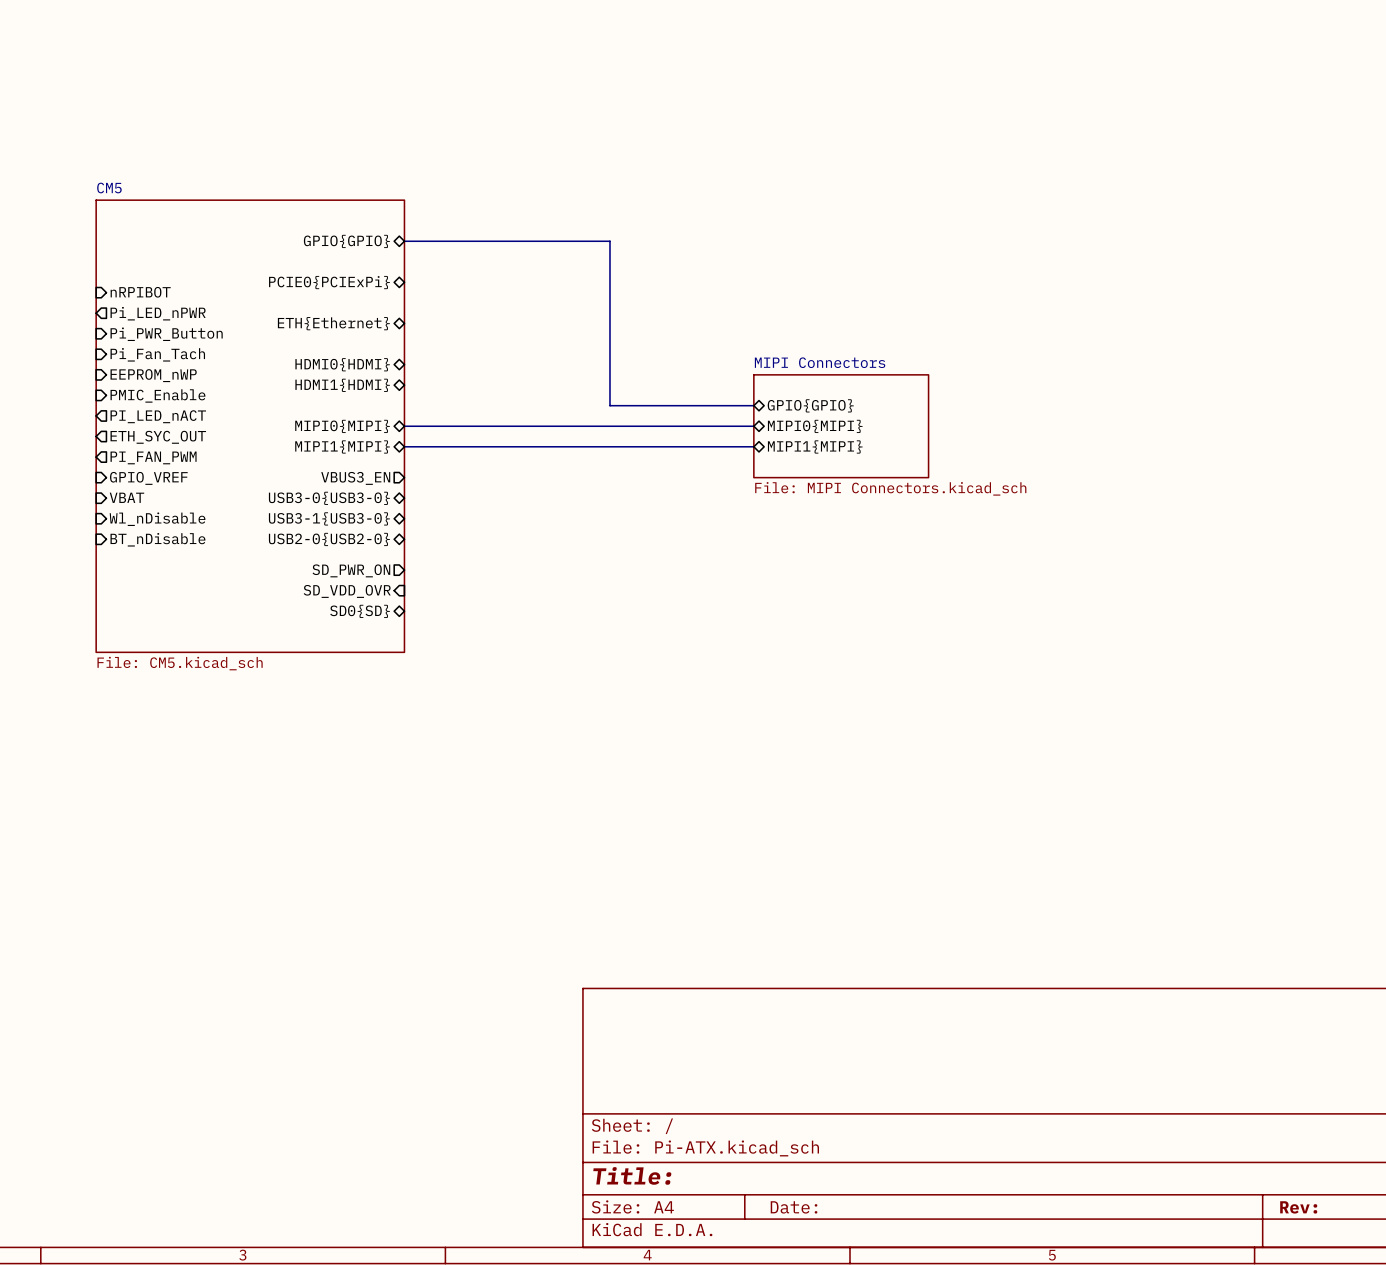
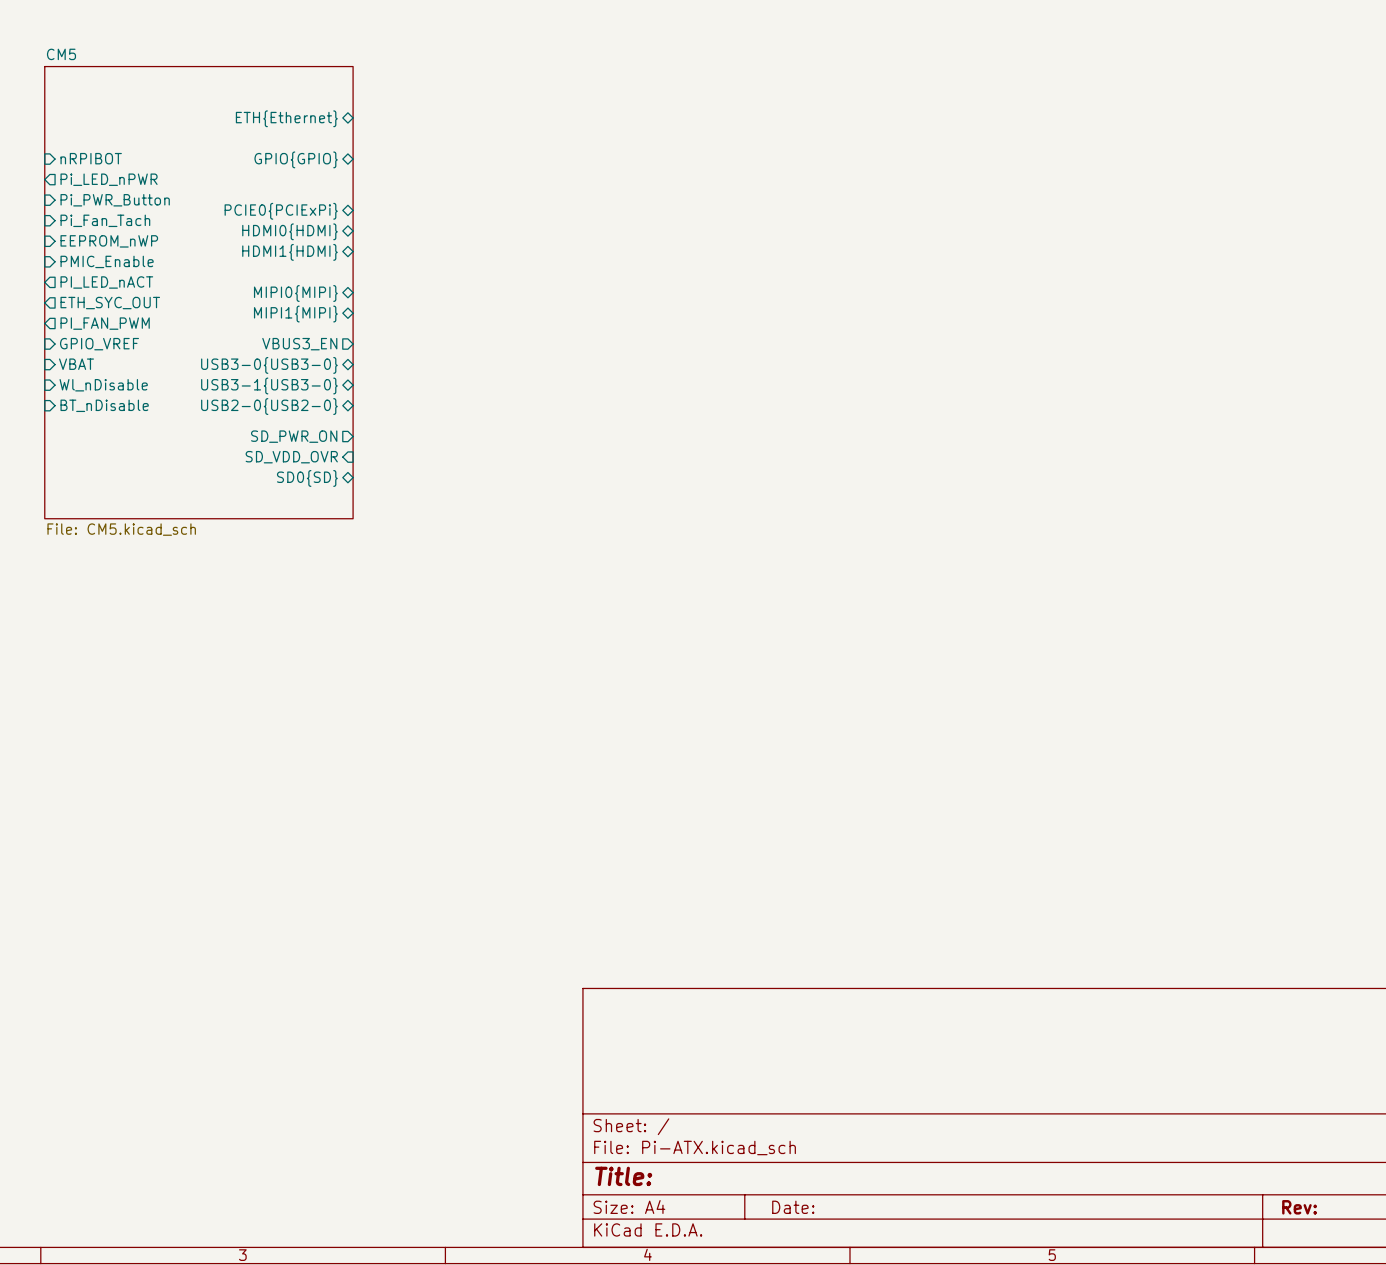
sheet pin: none -> ETH{Ethernet} (286, 118)
sheet pin position: GPIO{GPIO} (346, 241) -> GPIO{GPIO} (296, 159)
bus: (404, 241) (609, 241) (609, 405) (753, 405) -> none
sheet pin position: PCIE0{PCIExPi} (329, 282) -> PCIE0{PCIExPi} (281, 211)
sheet pin position: nRPIBOT (140, 292) -> nRPIBOT (91, 158)
sheet pin position: Pi_LED_nPWR (158, 313) -> Pi_LED_nPWR (109, 179)
sheet pin: ETH{Ethernet} (333, 323) -> none
sheet pin position: Pi_PWR_Button (166, 334) -> Pi_PWR_Button (115, 200)
sheet pin position: Pi_Fan_Tach (157, 354) -> Pi_Fan_Tach (105, 220)
sheet pin position: HDMI0{HDMI} (342, 364) -> HDMI0{HDMI} (290, 231)
sheet pin position: EEPROM_nWP (153, 375) -> EEPROM_nWP (109, 241)
sheet pin position: HDMI1{HDMI} (342, 385) -> HDMI1{HDMI} (290, 252)
sheet pin position: PMIC_Enable (157, 395) -> PMIC_Enable (107, 261)
sheet pin: GPIO{GPIO} (810, 405) -> none
sheet pin position: PI_LED_nACT (158, 416) -> PI_LED_nACT (106, 282)
sheet CM5 position: (250, 426) -> (198, 292)
sheet pin position: MIPI0{MIPI} (342, 426) -> MIPI0{MIPI} (295, 293)
bus: (404, 426) (753, 426) -> none
sheet pin: MIPI0{MIPI} (815, 426) -> none
sheet MIPI Connectors: File: MIPI Connectors.kicad_sch (841, 426) -> none
sheet pin position: ETH_SYC_OUT (158, 437) -> ETH_SYC_OUT (110, 303)
sheet pin position: MIPI1{MIPI} (342, 446) -> MIPI1{MIPI} (295, 314)
bus: (404, 446) (753, 446) -> none
sheet pin: MIPI1{MIPI} (815, 446) -> none
sheet pin position: PI_FAN_PWM (153, 457) -> PI_FAN_PWM (105, 323)
sheet pin position: GPIO_VREF (148, 478) -> GPIO_VREF (99, 344)
sheet pin position: VBUS3_EN (355, 478) -> VBUS3_EN (299, 344)
sheet pin position: VBAT (126, 497) -> VBAT (76, 364)
sheet pin position: USB3-0{USB3-0} (329, 498) -> USB3-0{USB3-0} (269, 365)
sheet pin position: USB3-1{USB3-0} (329, 518) -> USB3-1{USB3-0} (269, 385)
sheet pin position: Wl_nDisable (157, 519) -> Wl_nDisable (103, 385)
sheet pin position: BT_nDisable (157, 539) -> BT_nDisable (104, 405)
sheet pin position: USB2-0{USB2-0} (329, 539) -> USB2-0{USB2-0} (269, 406)
sheet pin position: SD_PWR_ON (351, 570) -> SD_PWR_ON (294, 436)
sheet pin position: SD_VDD_OVR (347, 591) -> SD_VDD_OVR (291, 457)
sheet pin position: SD0{SD} (360, 611) -> SD0{SD} (307, 478)

